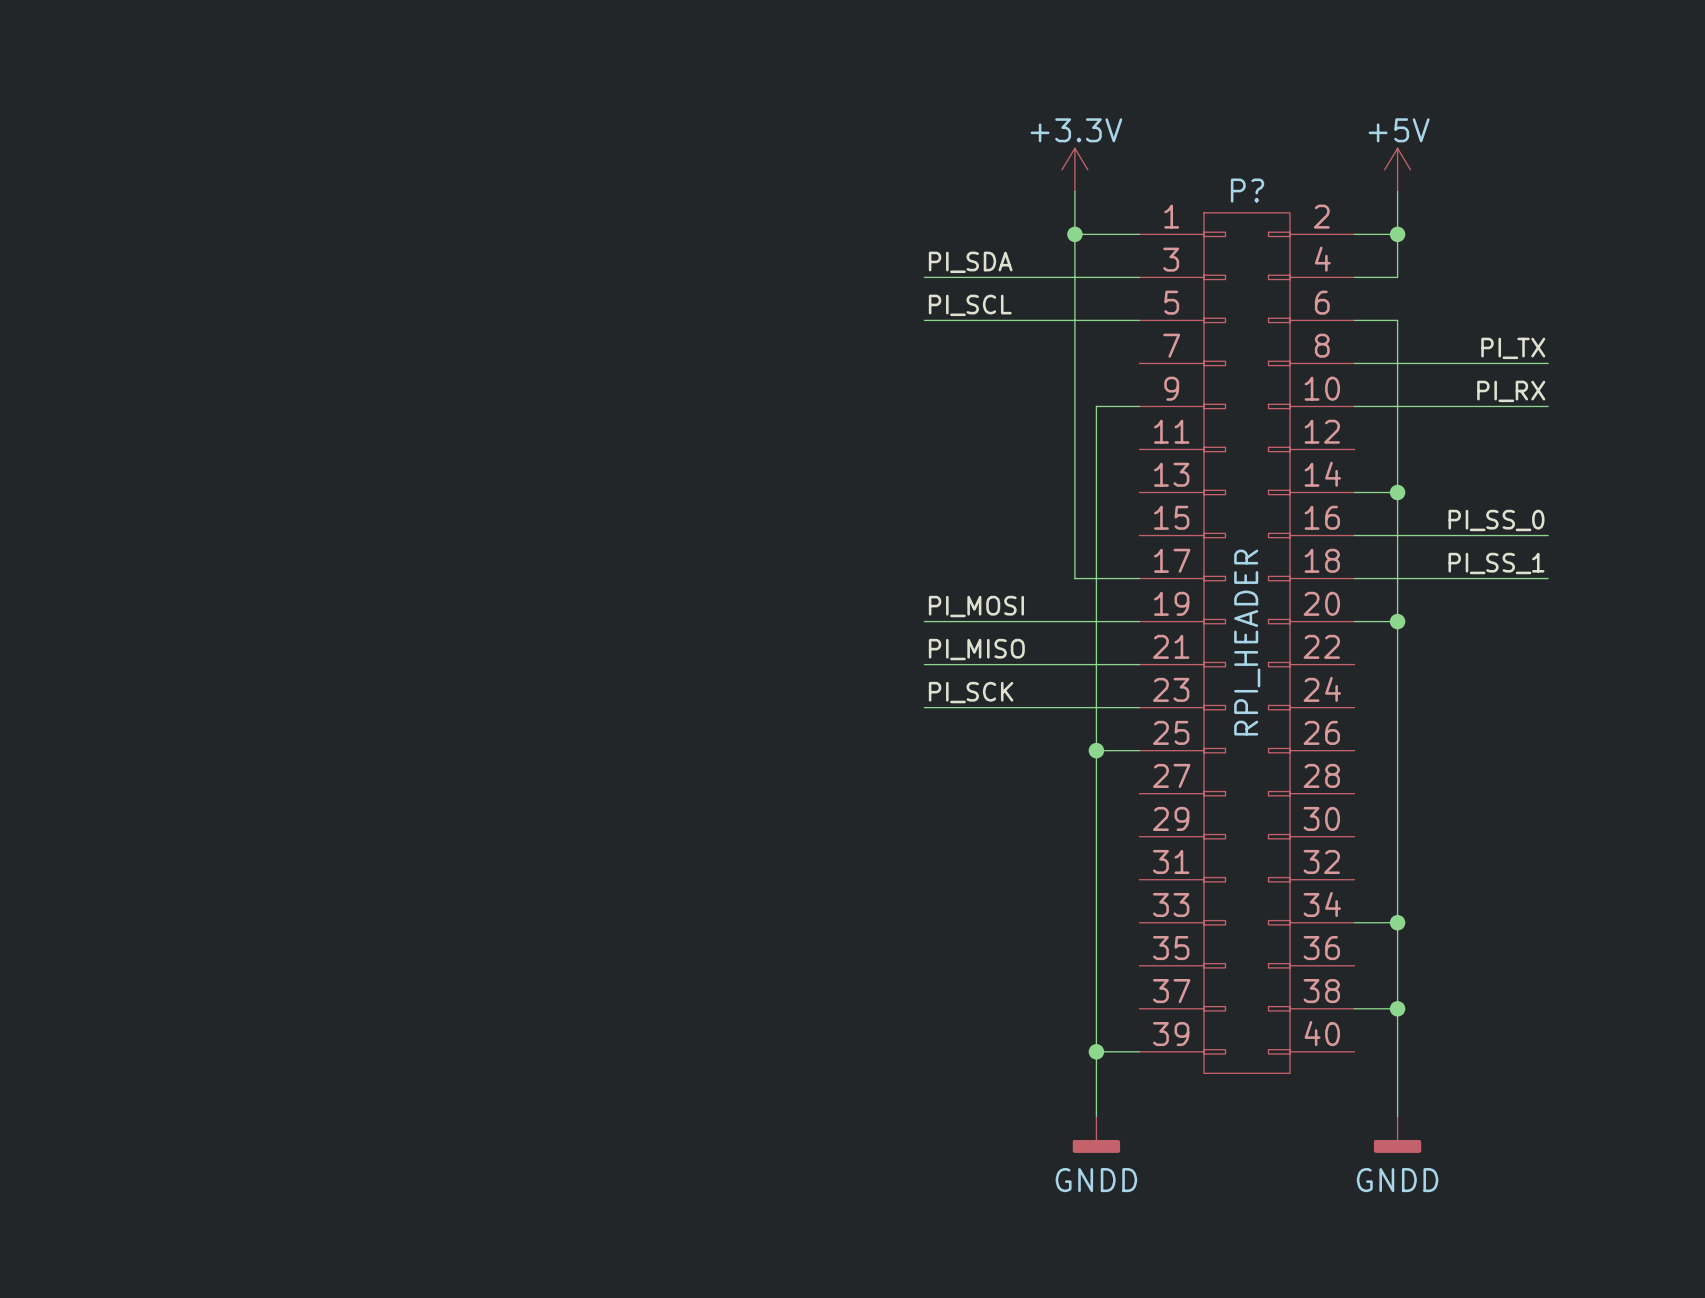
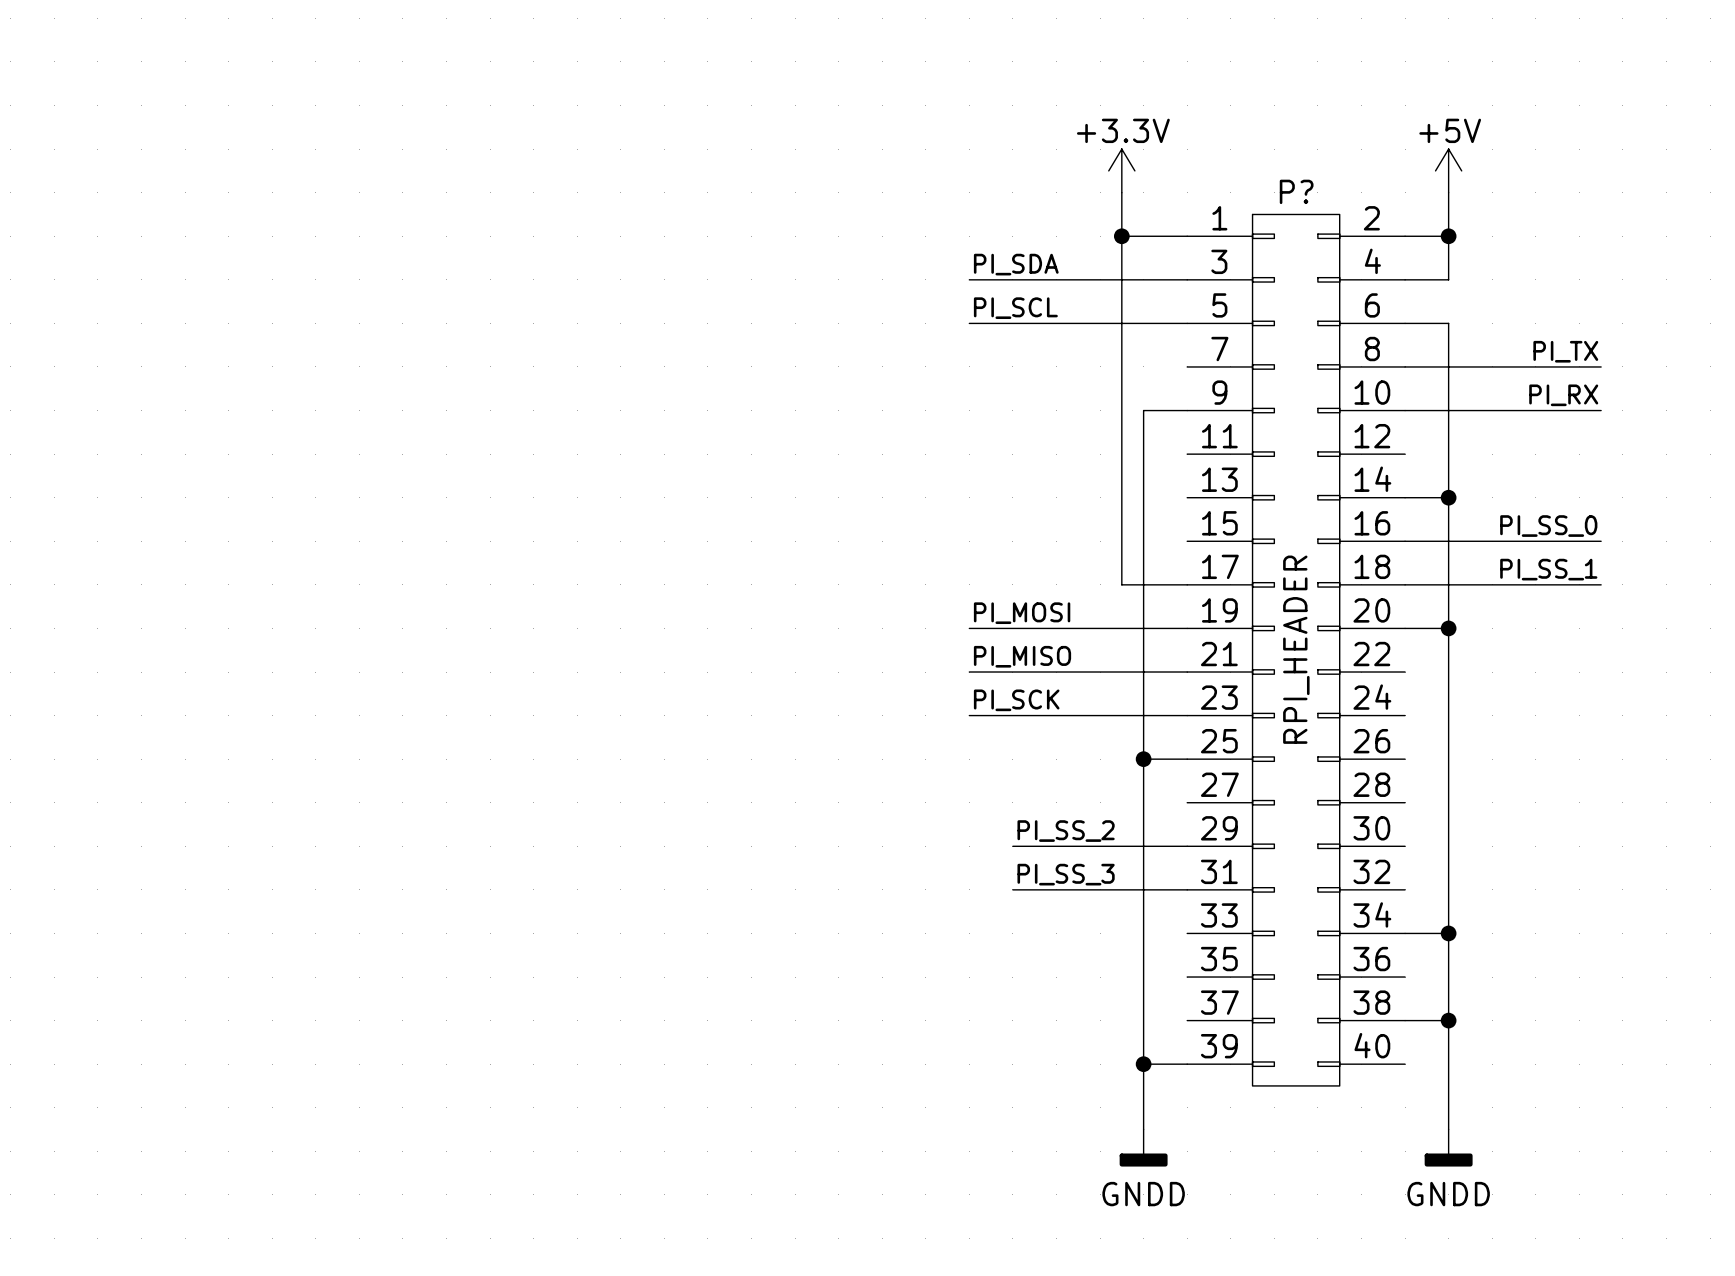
label: none -> PI_SS_2 (1066, 831)
wire: none -> (1012, 846) (1187, 846)
label: none -> PI_SS_3 (1066, 874)
wire: none -> (1012, 889) (1187, 889)

